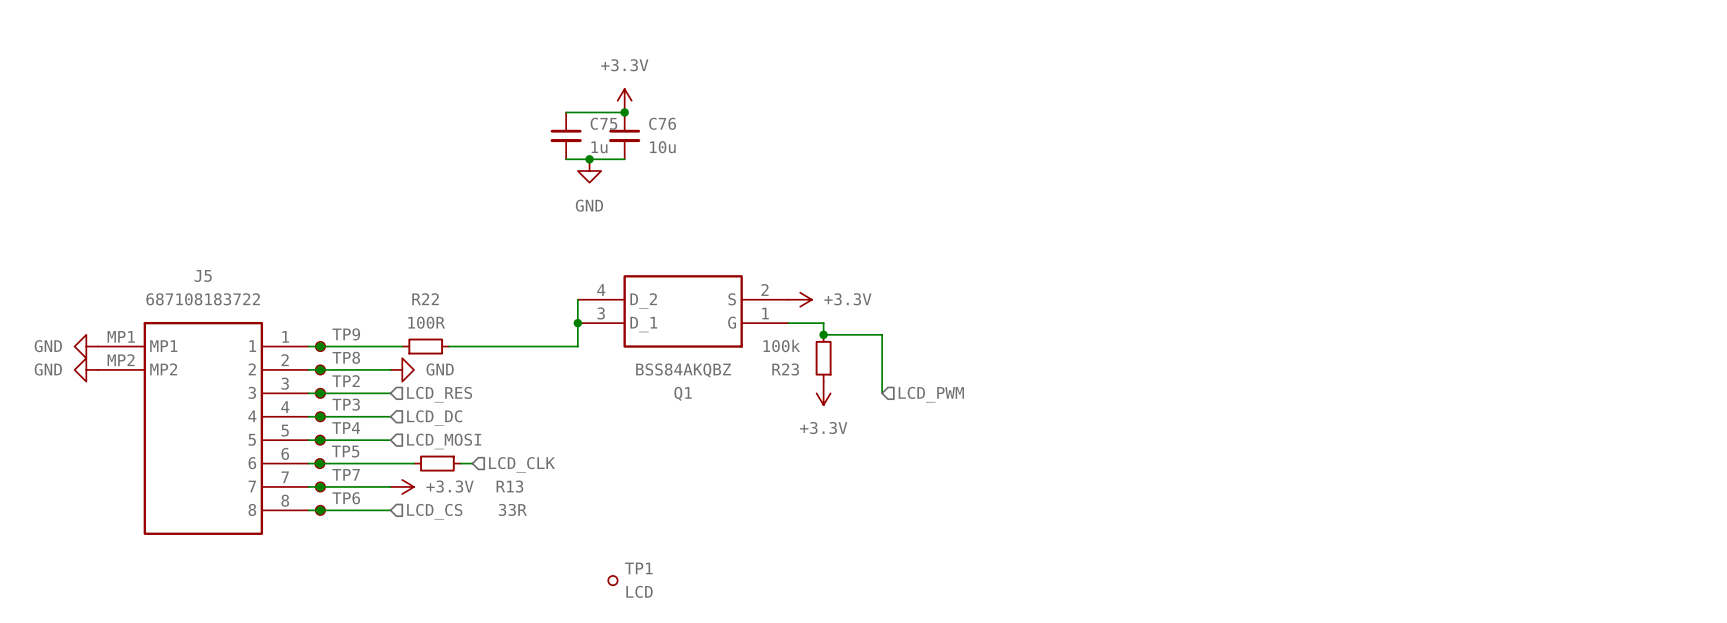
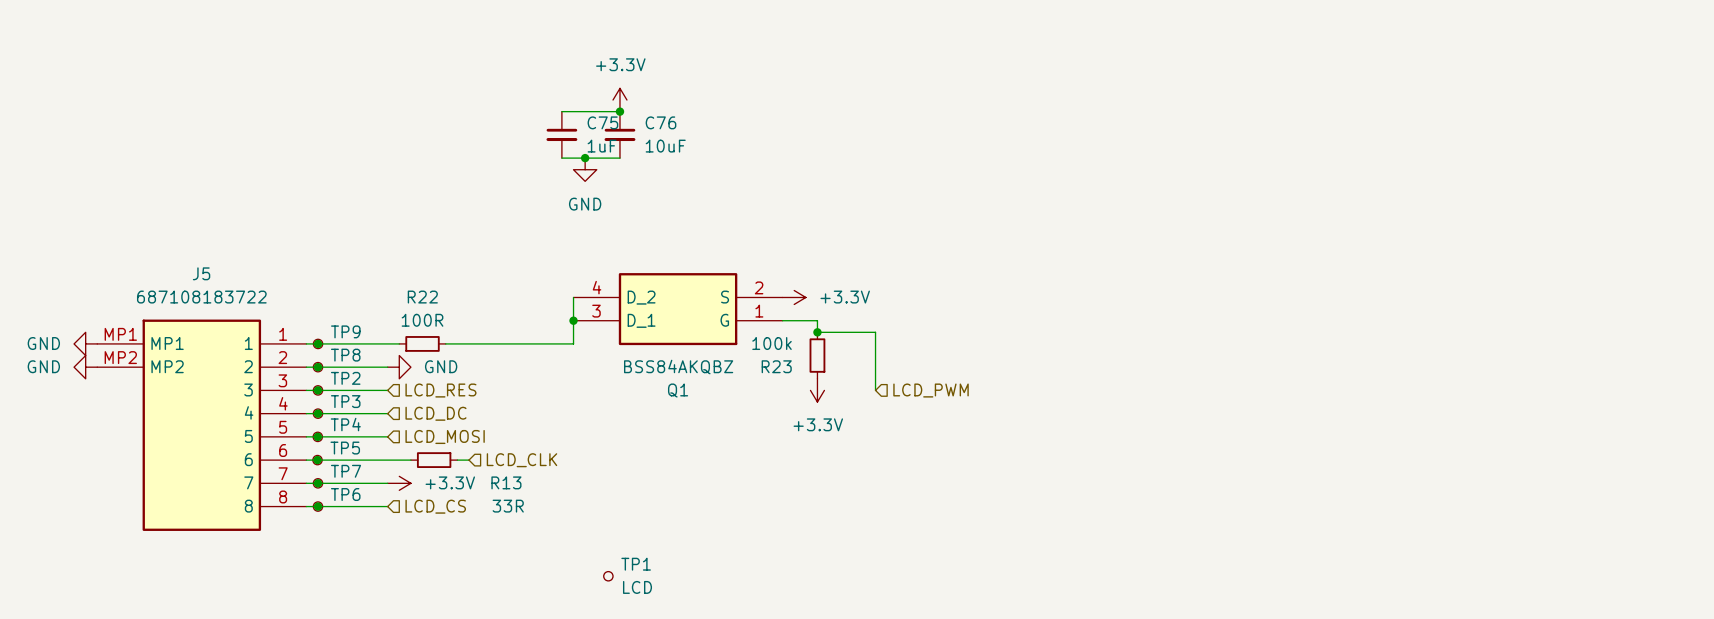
C75 value: 1u (599, 147) -> 1uF (602, 146)
C76 value: 10u (662, 147) -> 10uF (665, 146)

